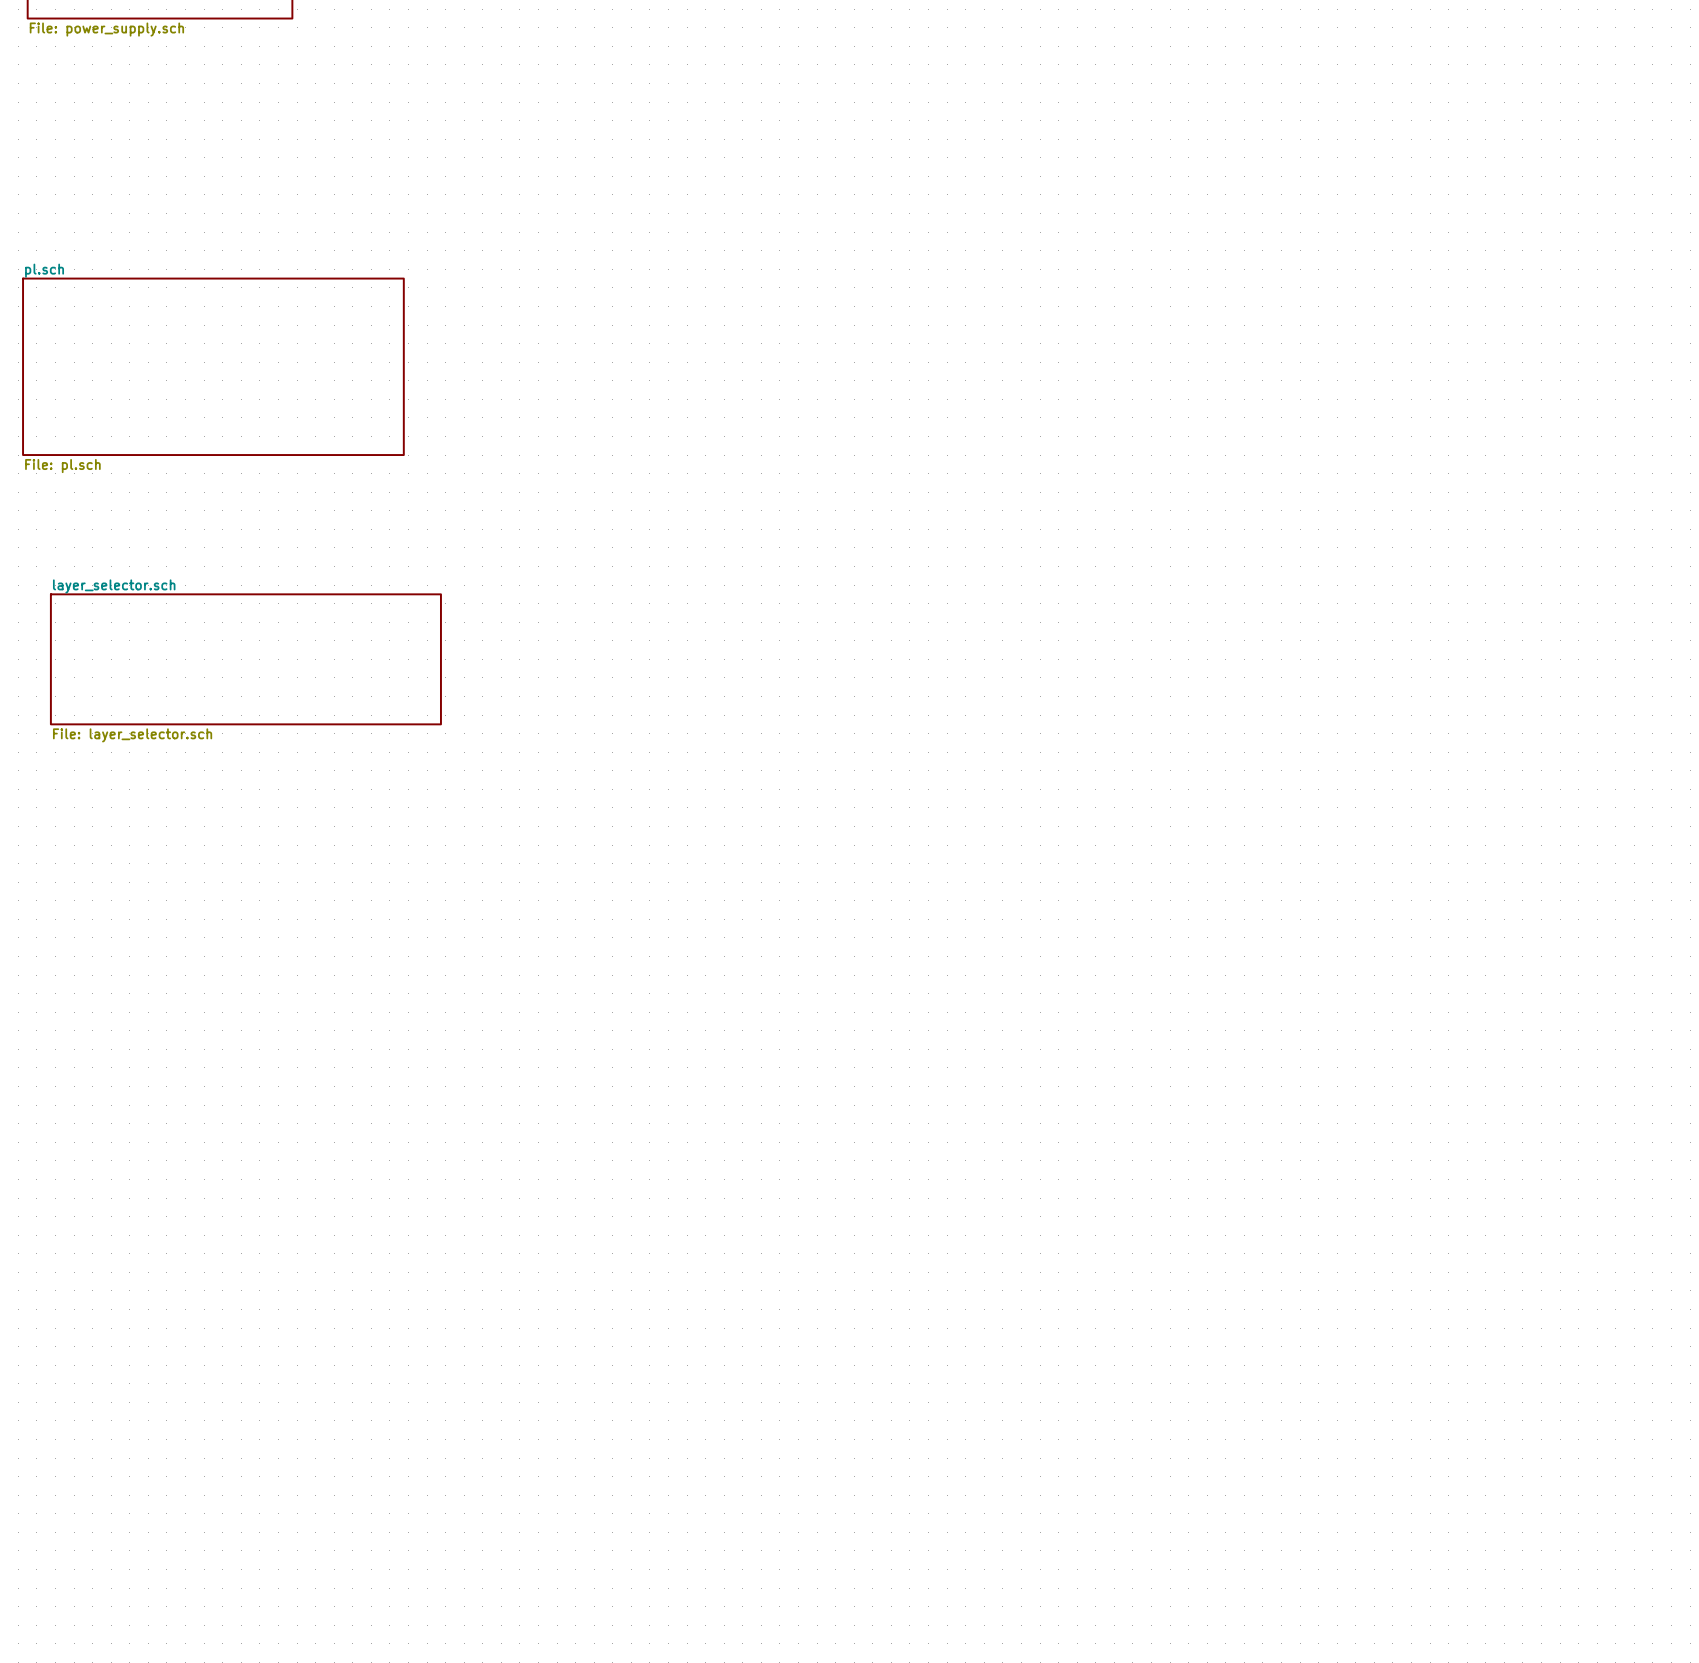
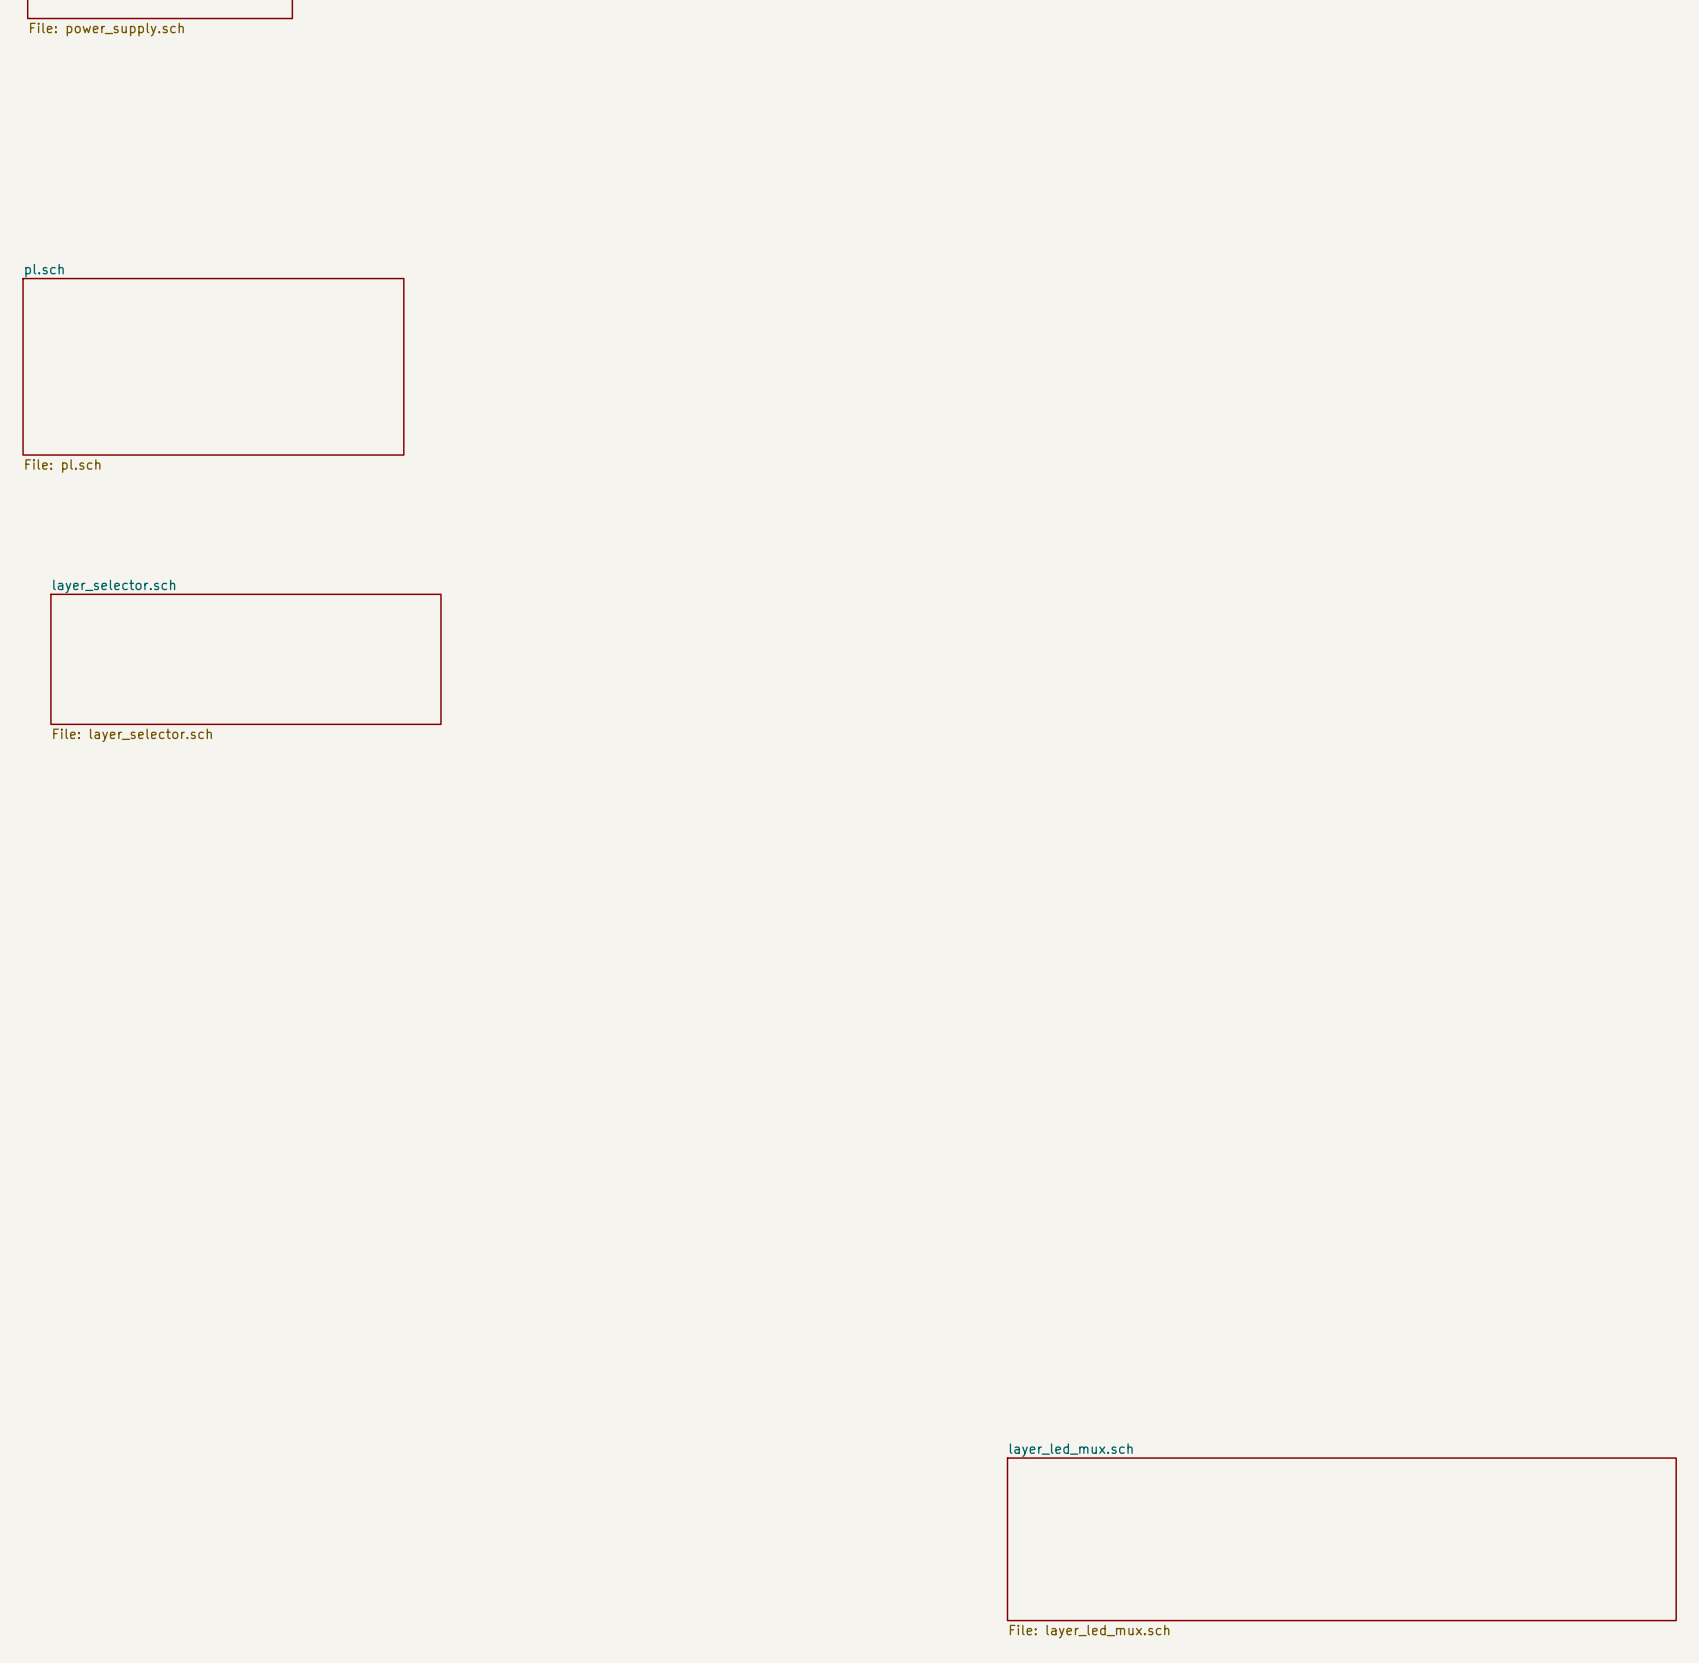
sheet layer_led_mux.sch: none -> File: layer_led_mux.sch (1341, 1539)

